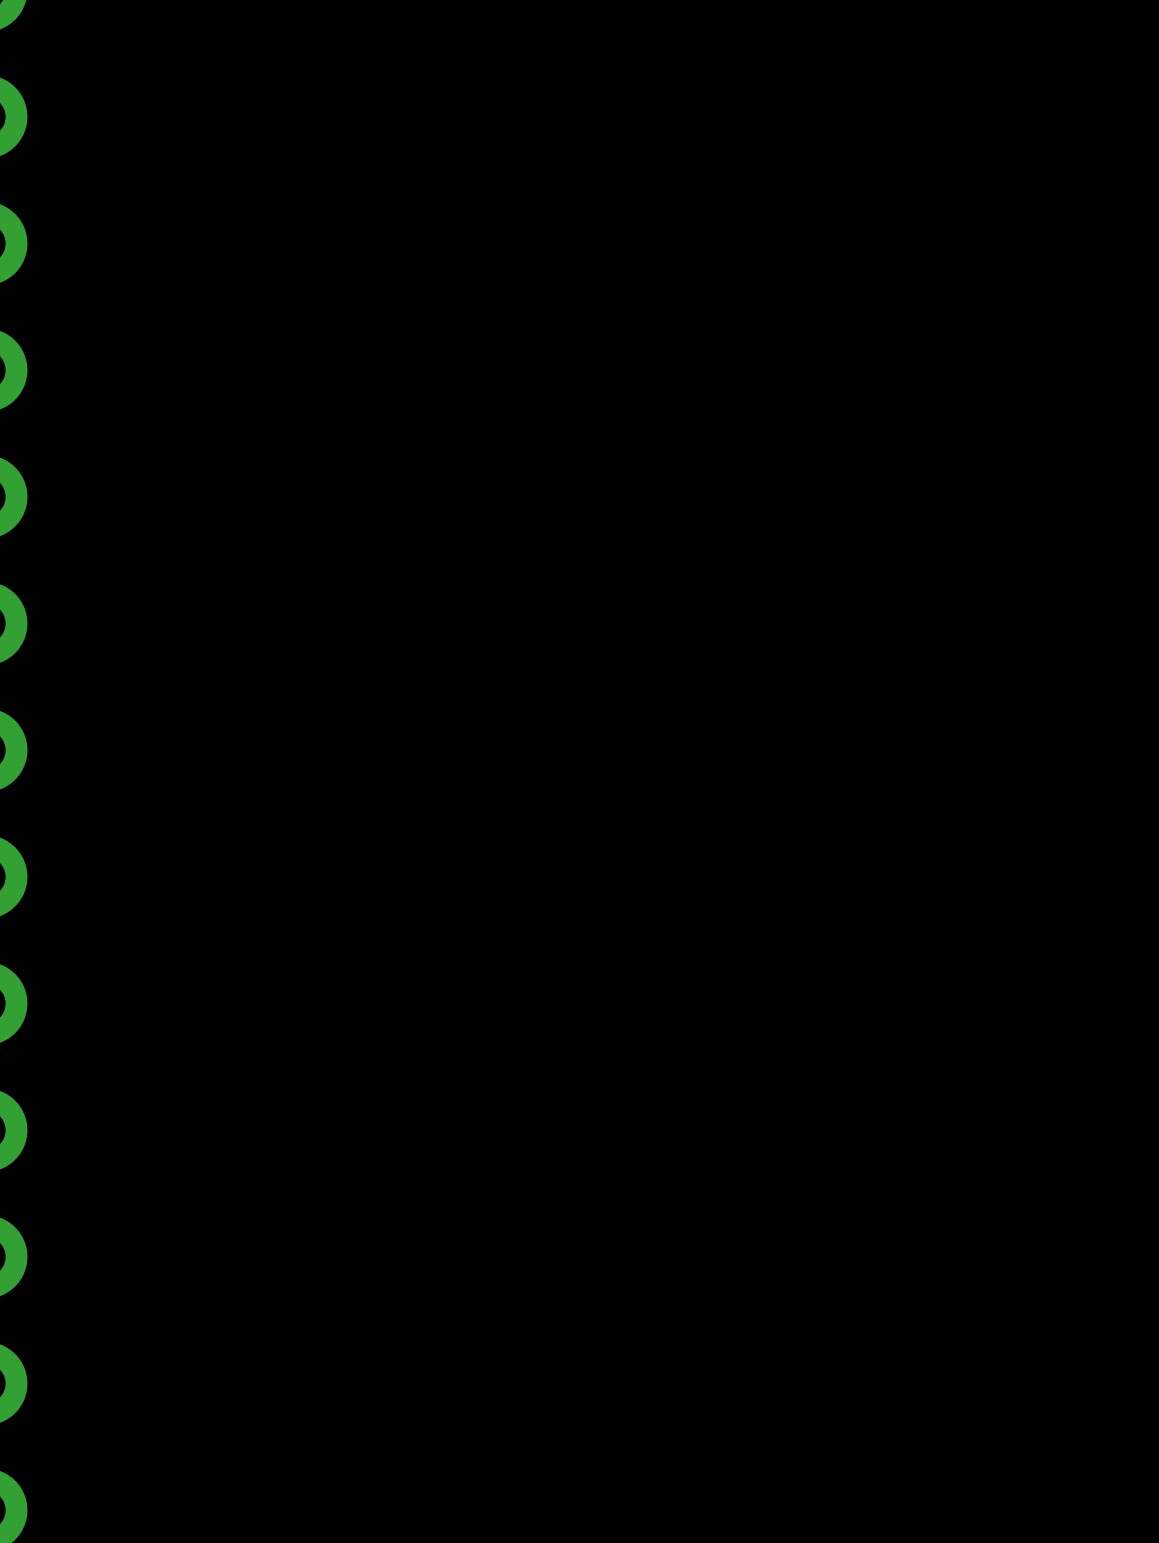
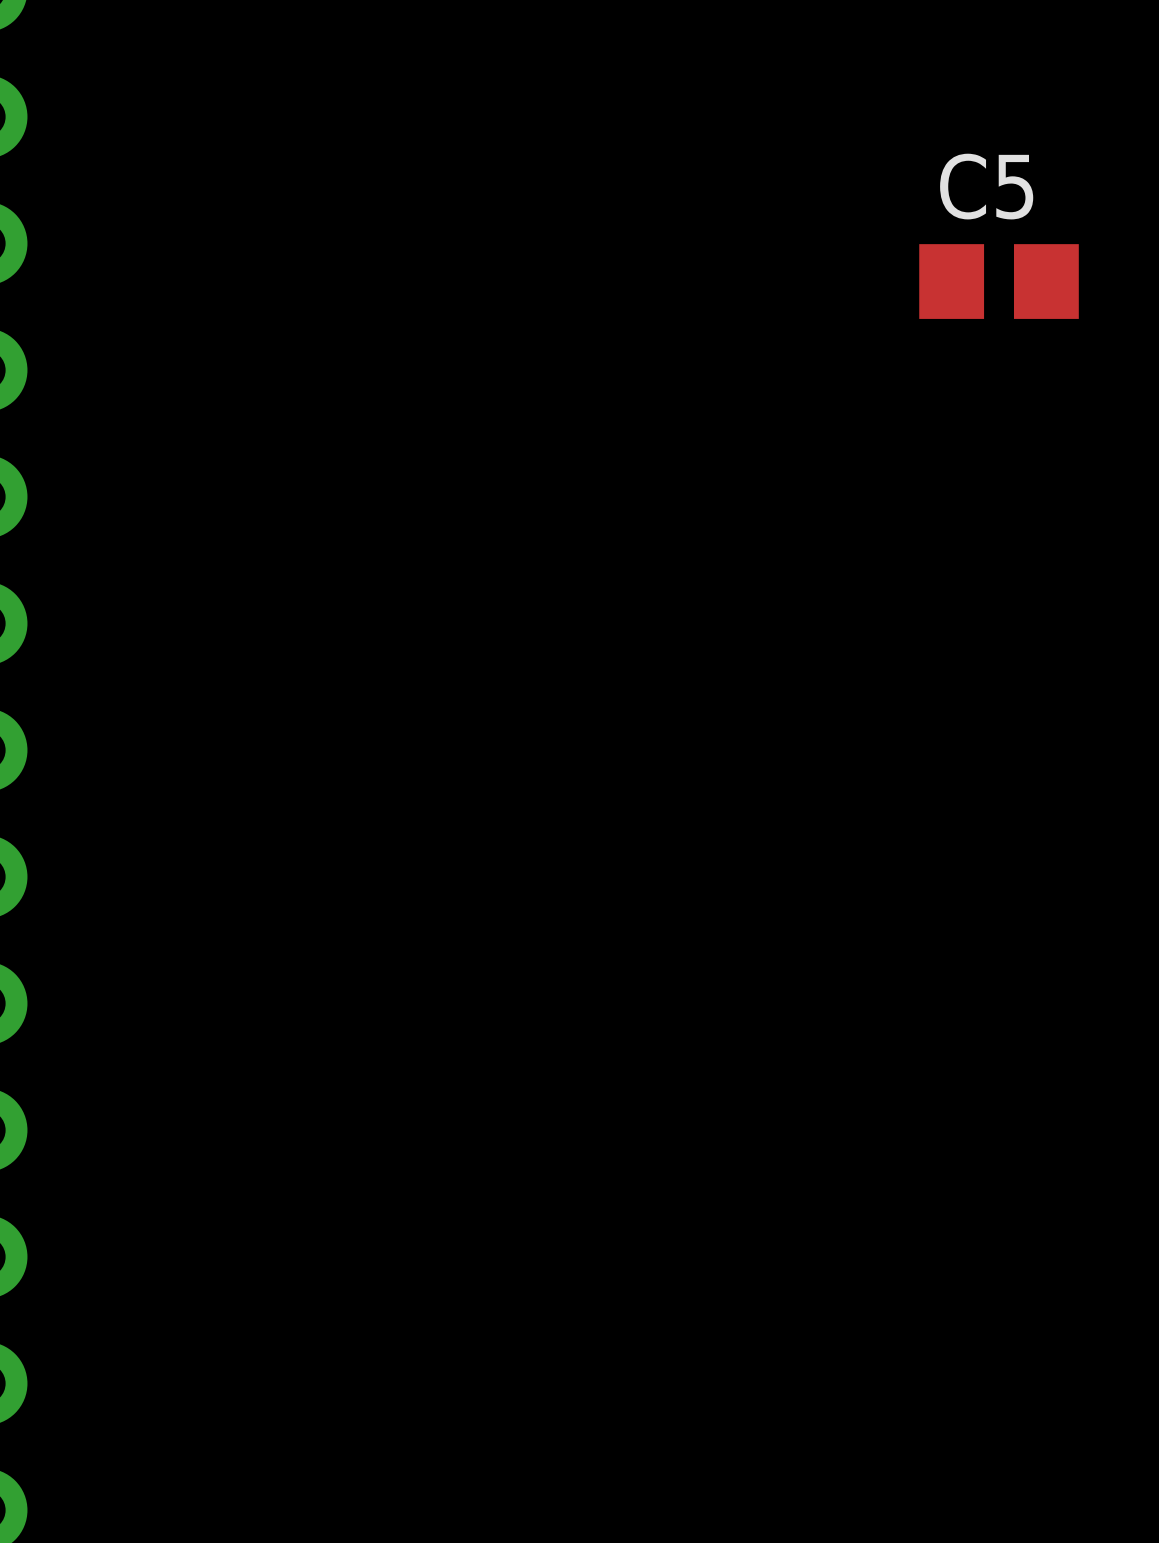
C5: none -> (999, 281)

